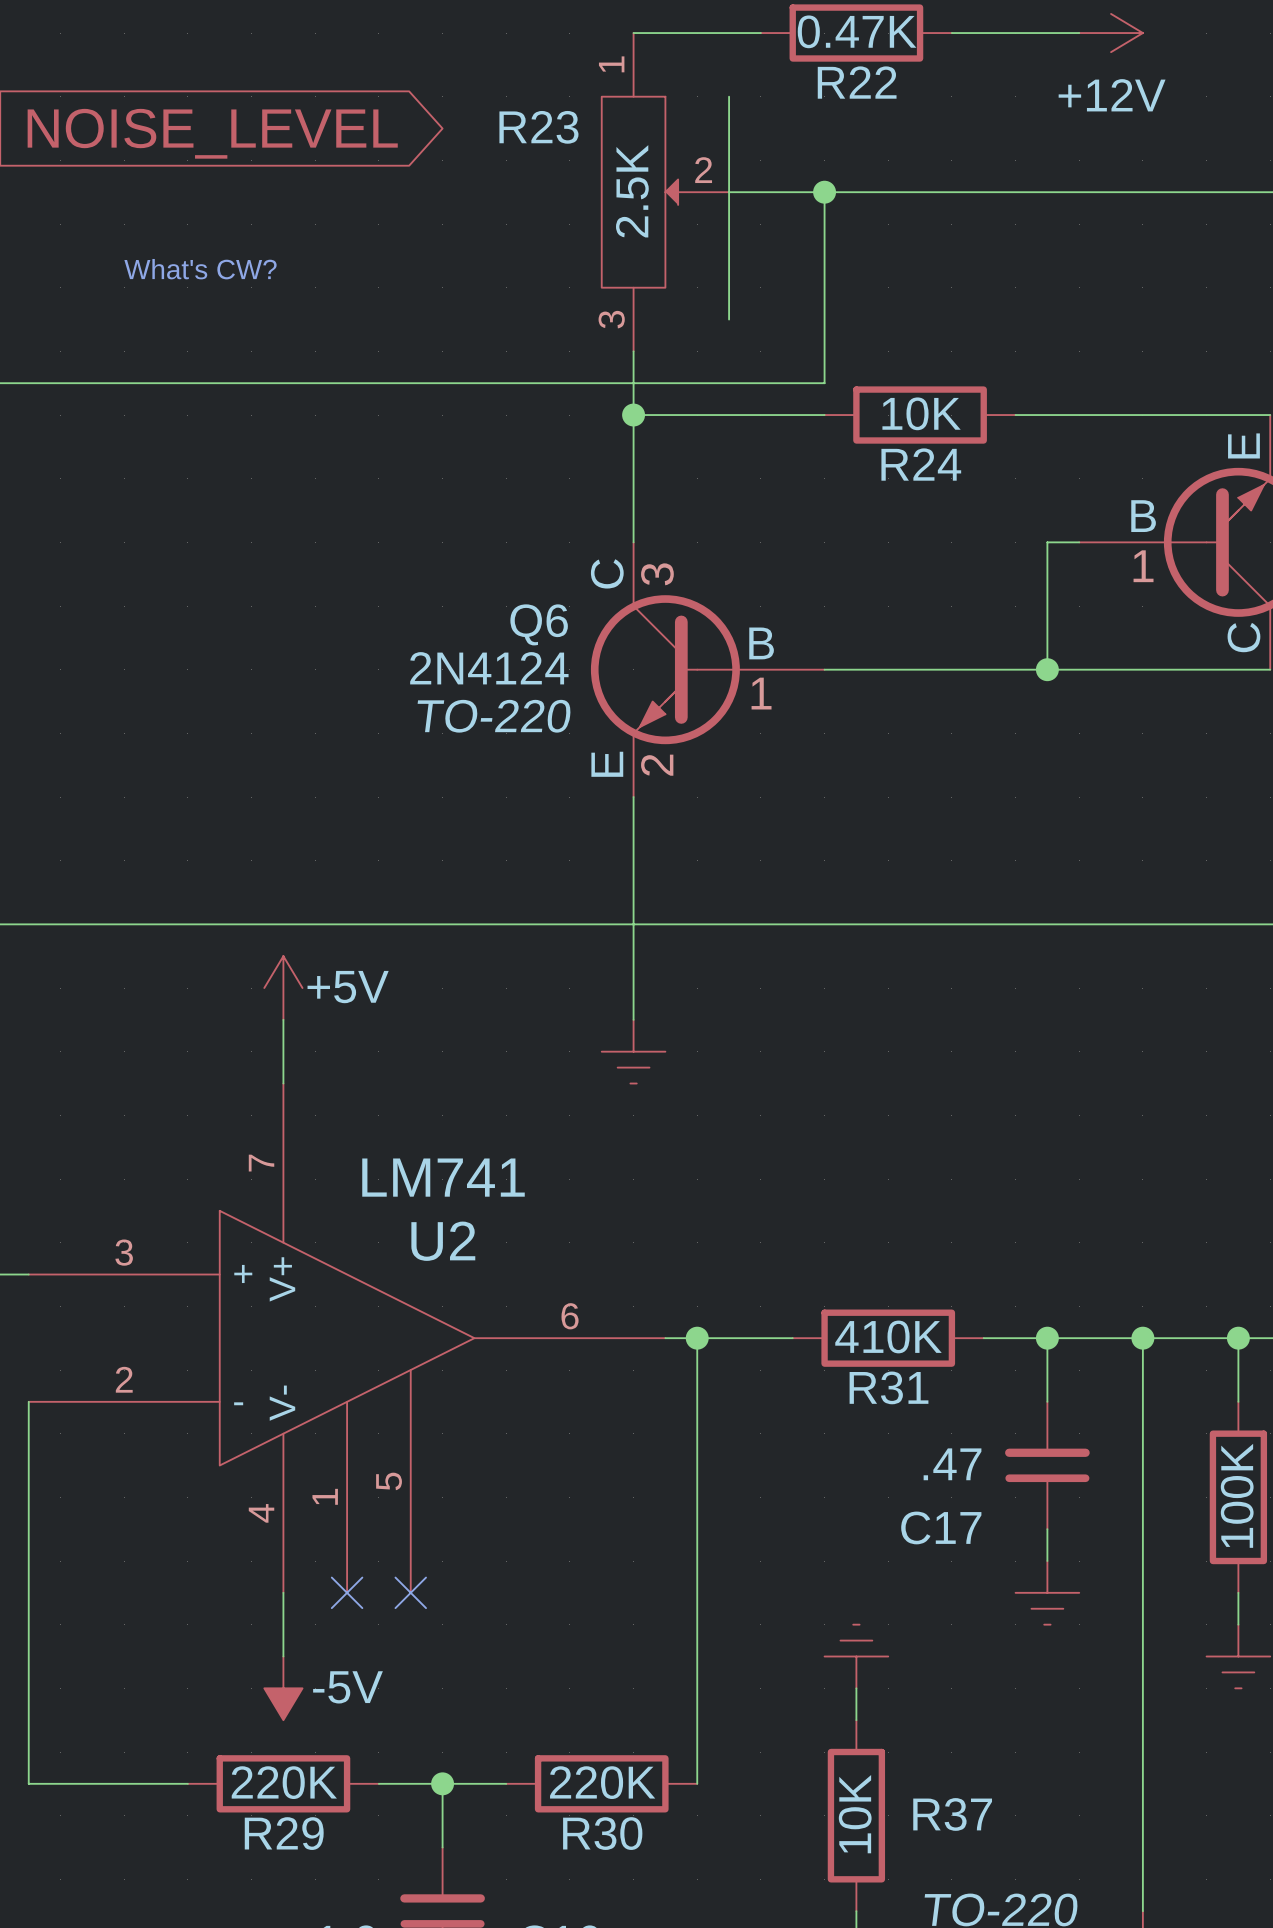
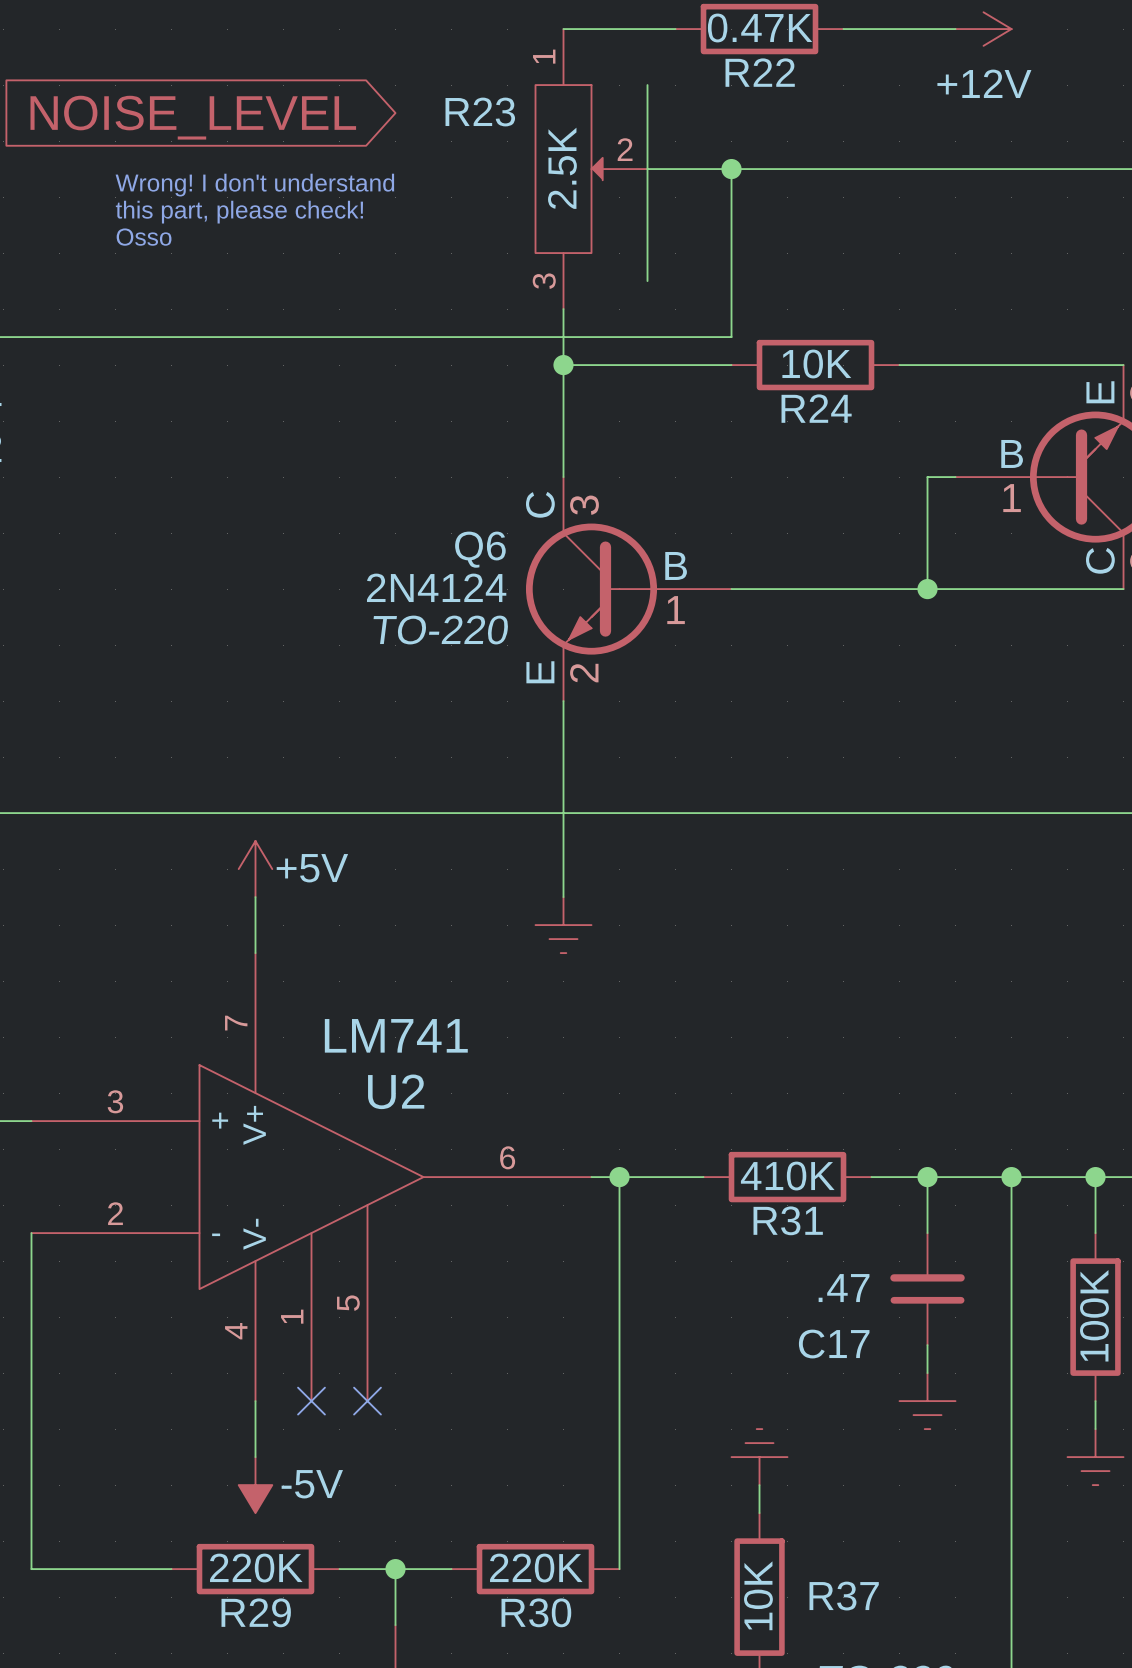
text: none -> Wrong! I don't understand (254, 185)
text: none -> this part, please check! (239, 212)
text: What's CW? (200, 269) -> Osso (144, 237)

